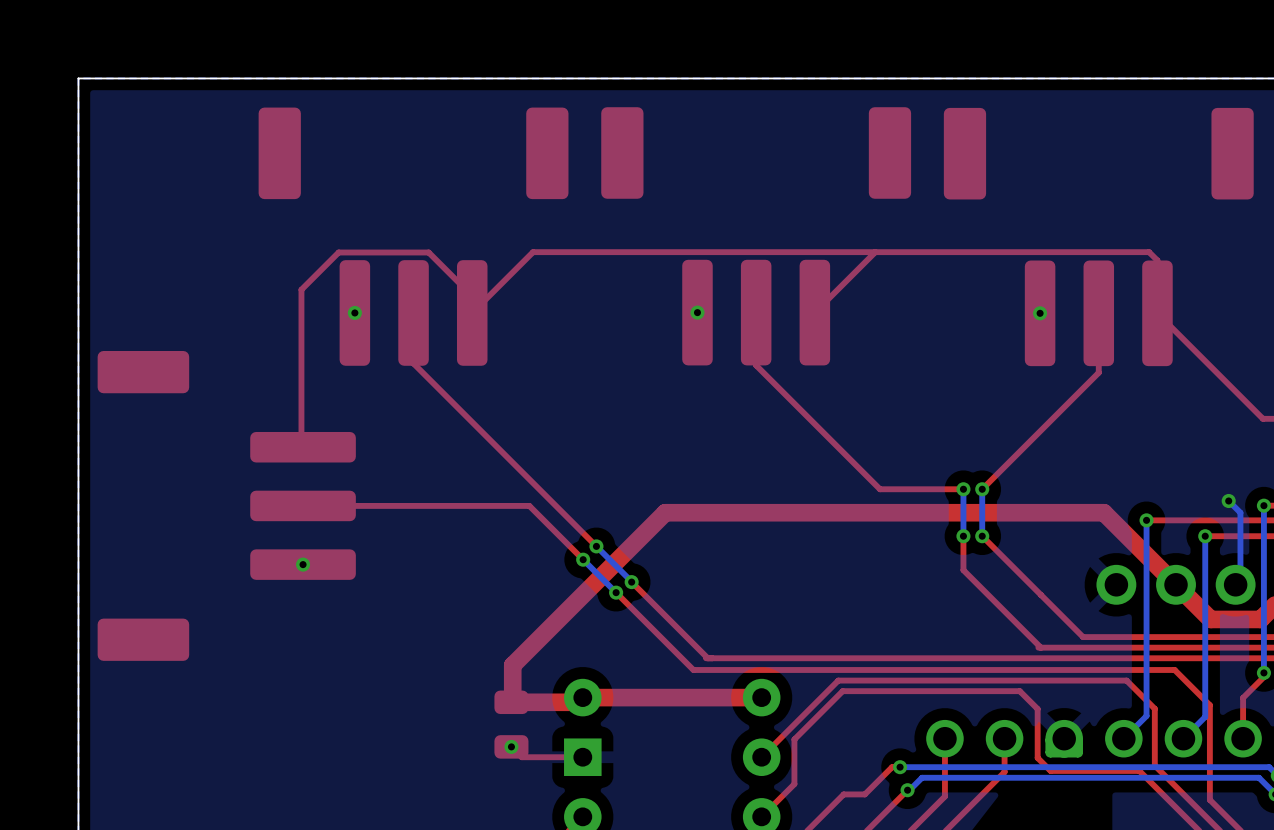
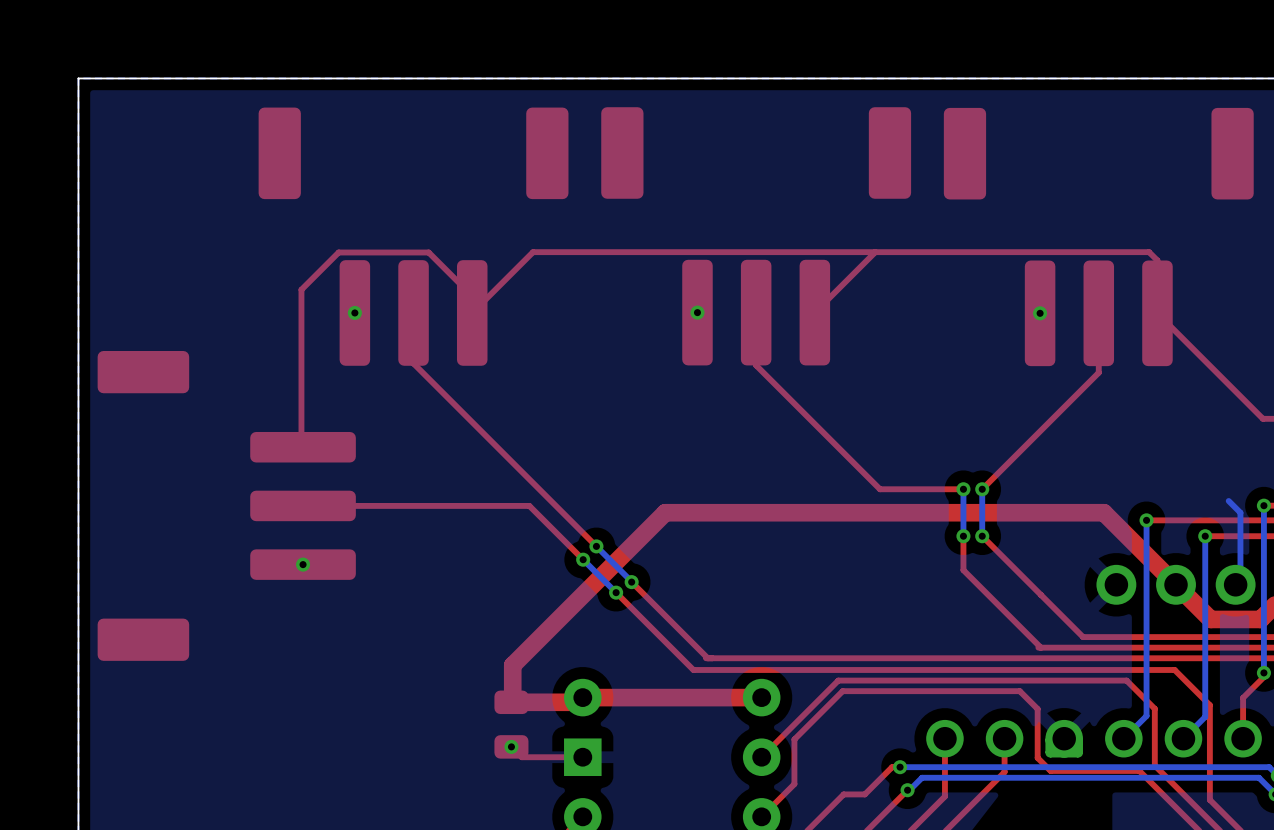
via: (1228, 501) -> none

